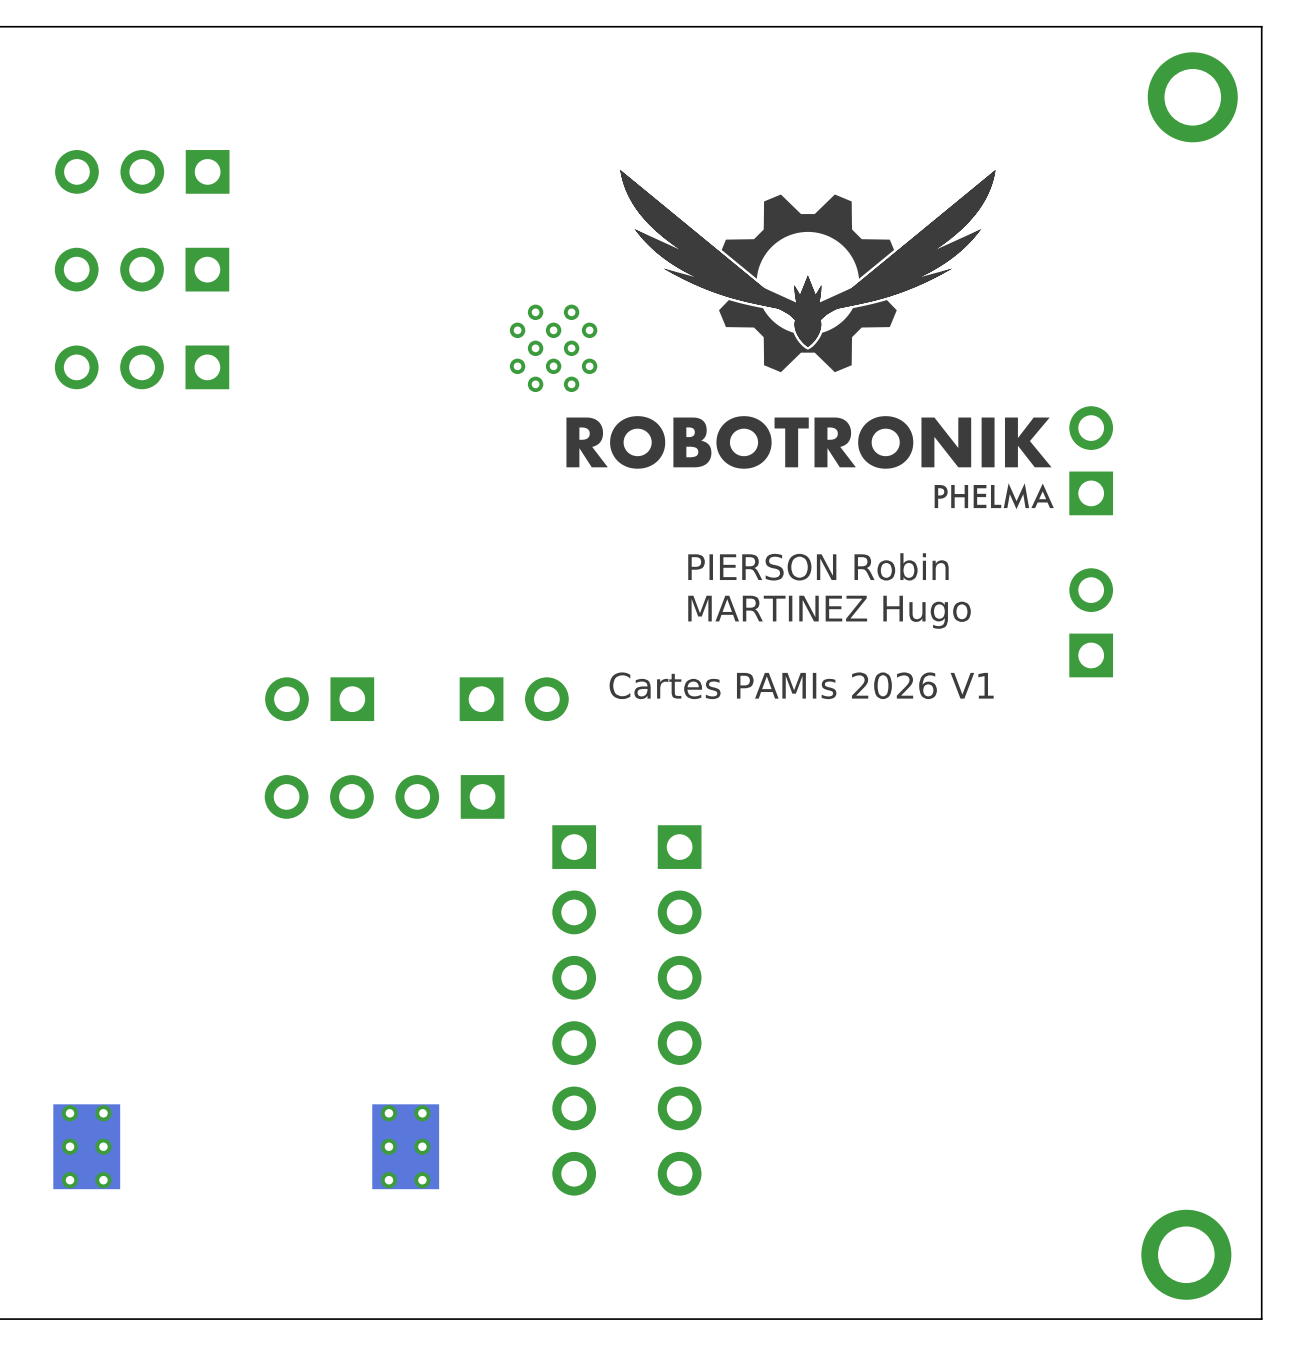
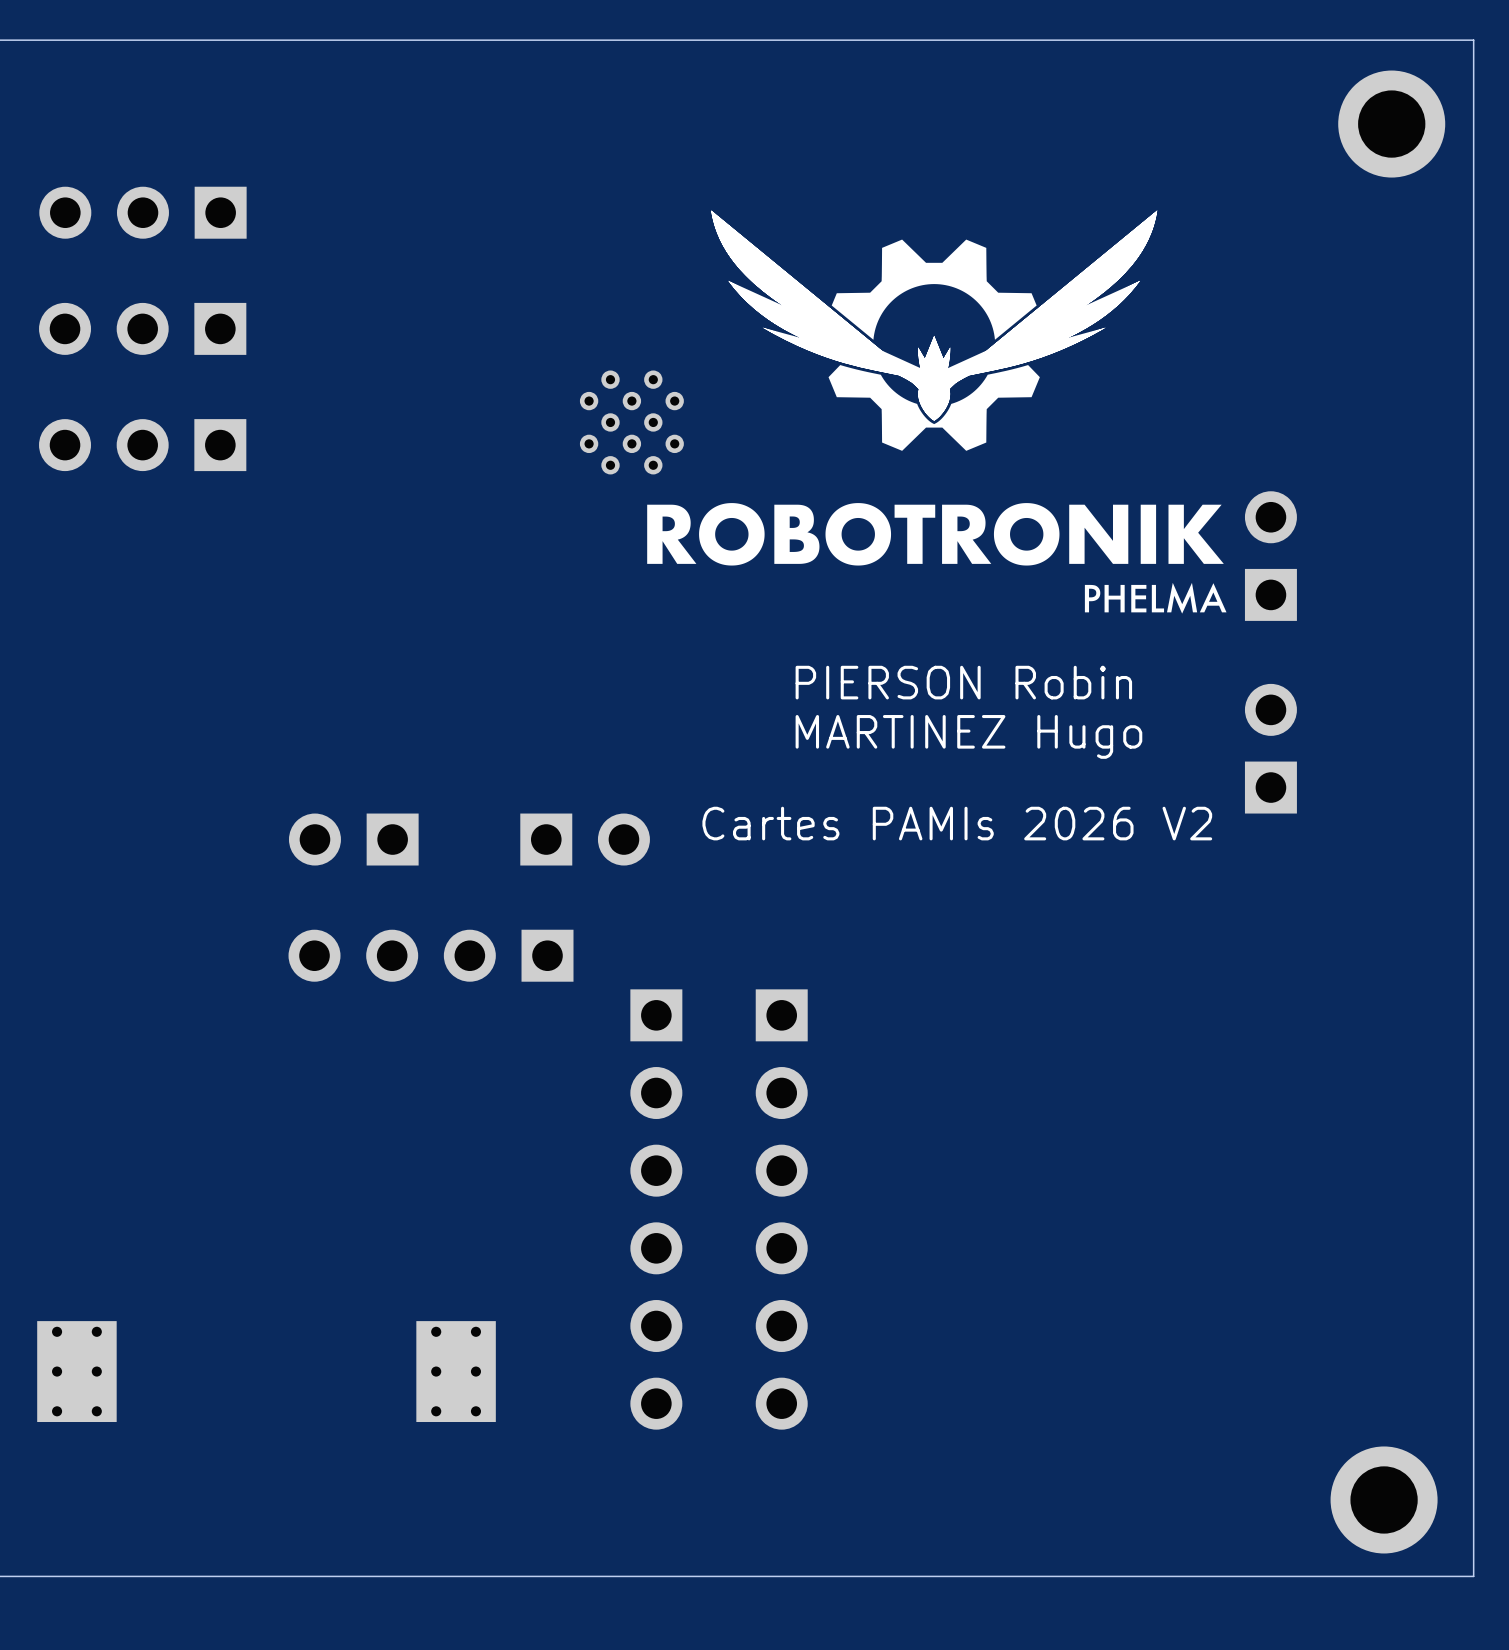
text: Cartes PAMIs 2026 V1 (801, 685) -> Cartes PAMIs 2026 V2 (957, 823)

